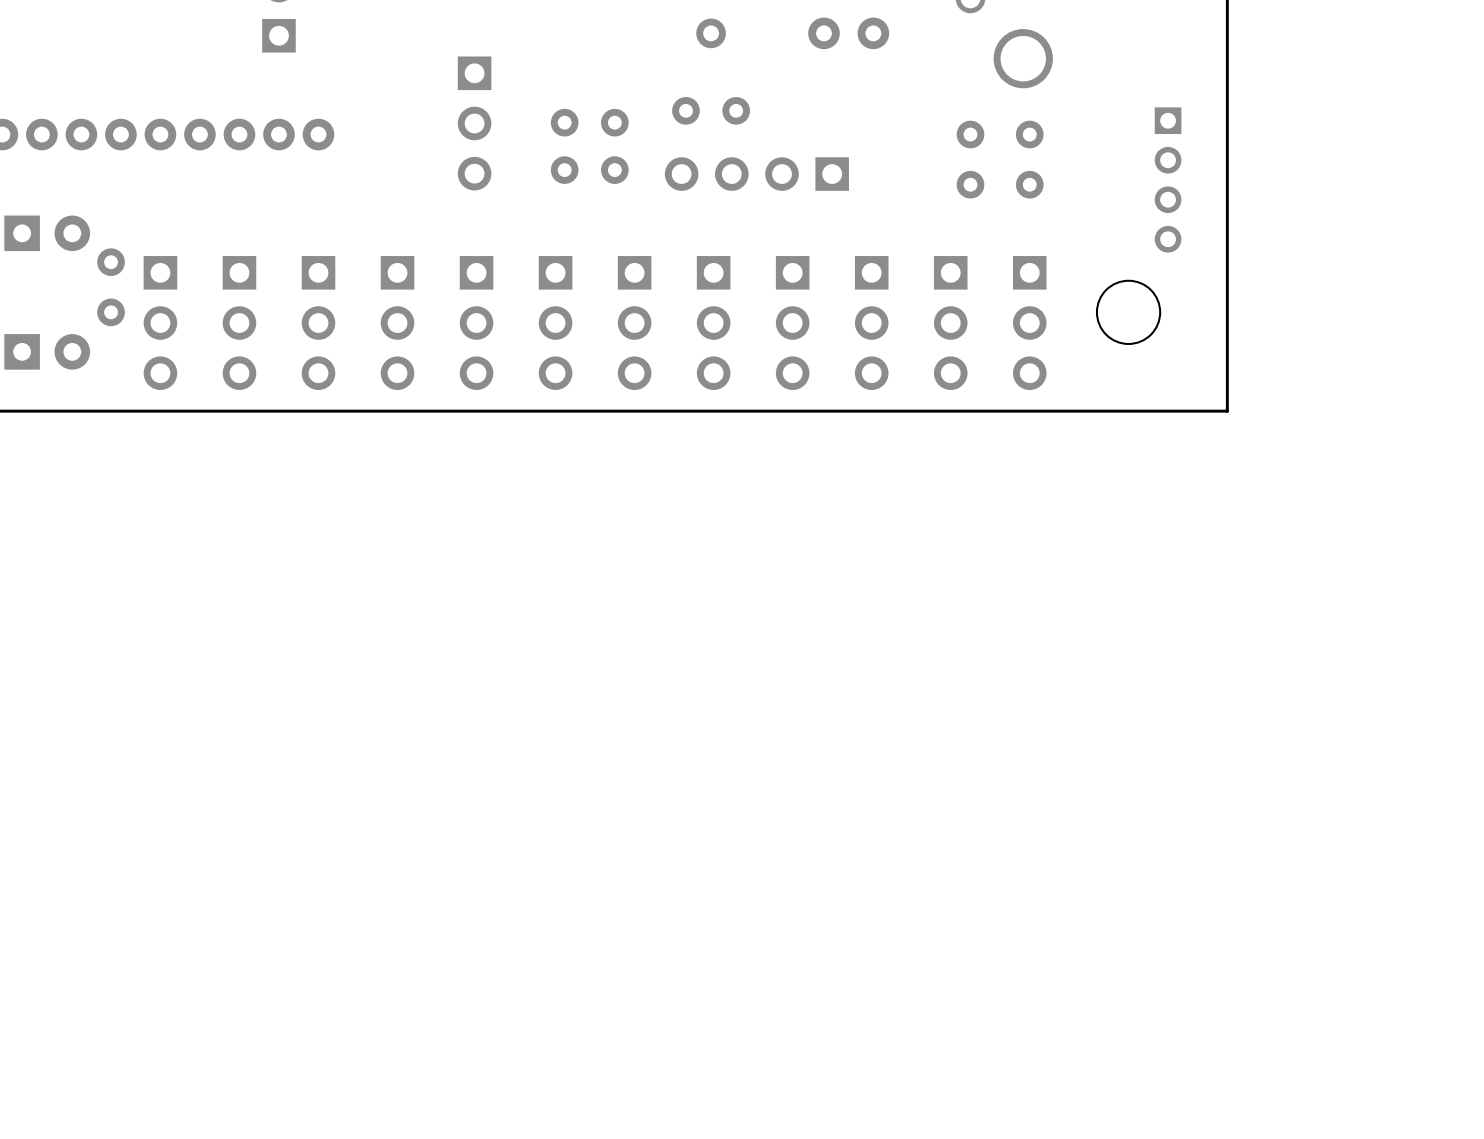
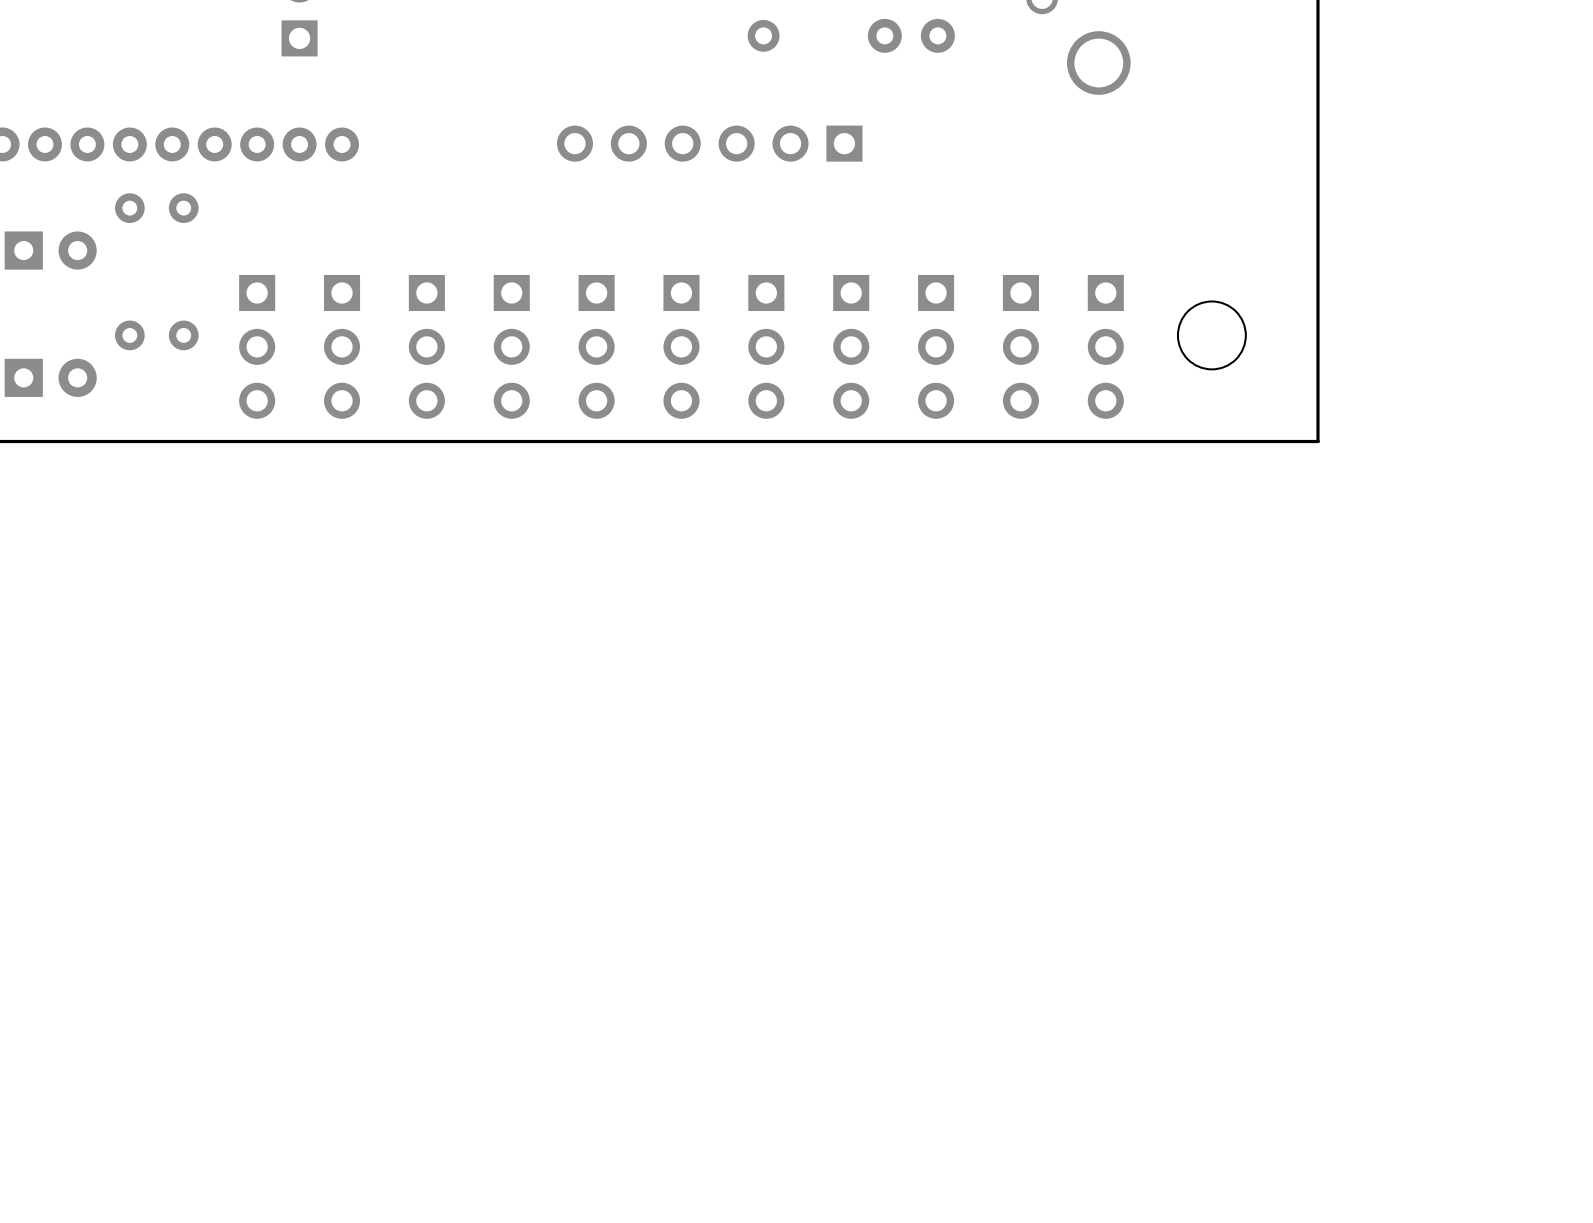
part: (711, 110) -> none
part: (589, 122) -> none
part: (474, 123) -> none
part: none -> (709, 143)
part: (970, 159) -> none
part: (1029, 159) -> none
part: (589, 170) -> none
part: (756, 174) -> none
part: (1168, 179) -> none
part: none -> (156, 208)
part footprint: [143, 256, 178, 391] -> [114, 320, 199, 351]
part: (111, 287) -> none

